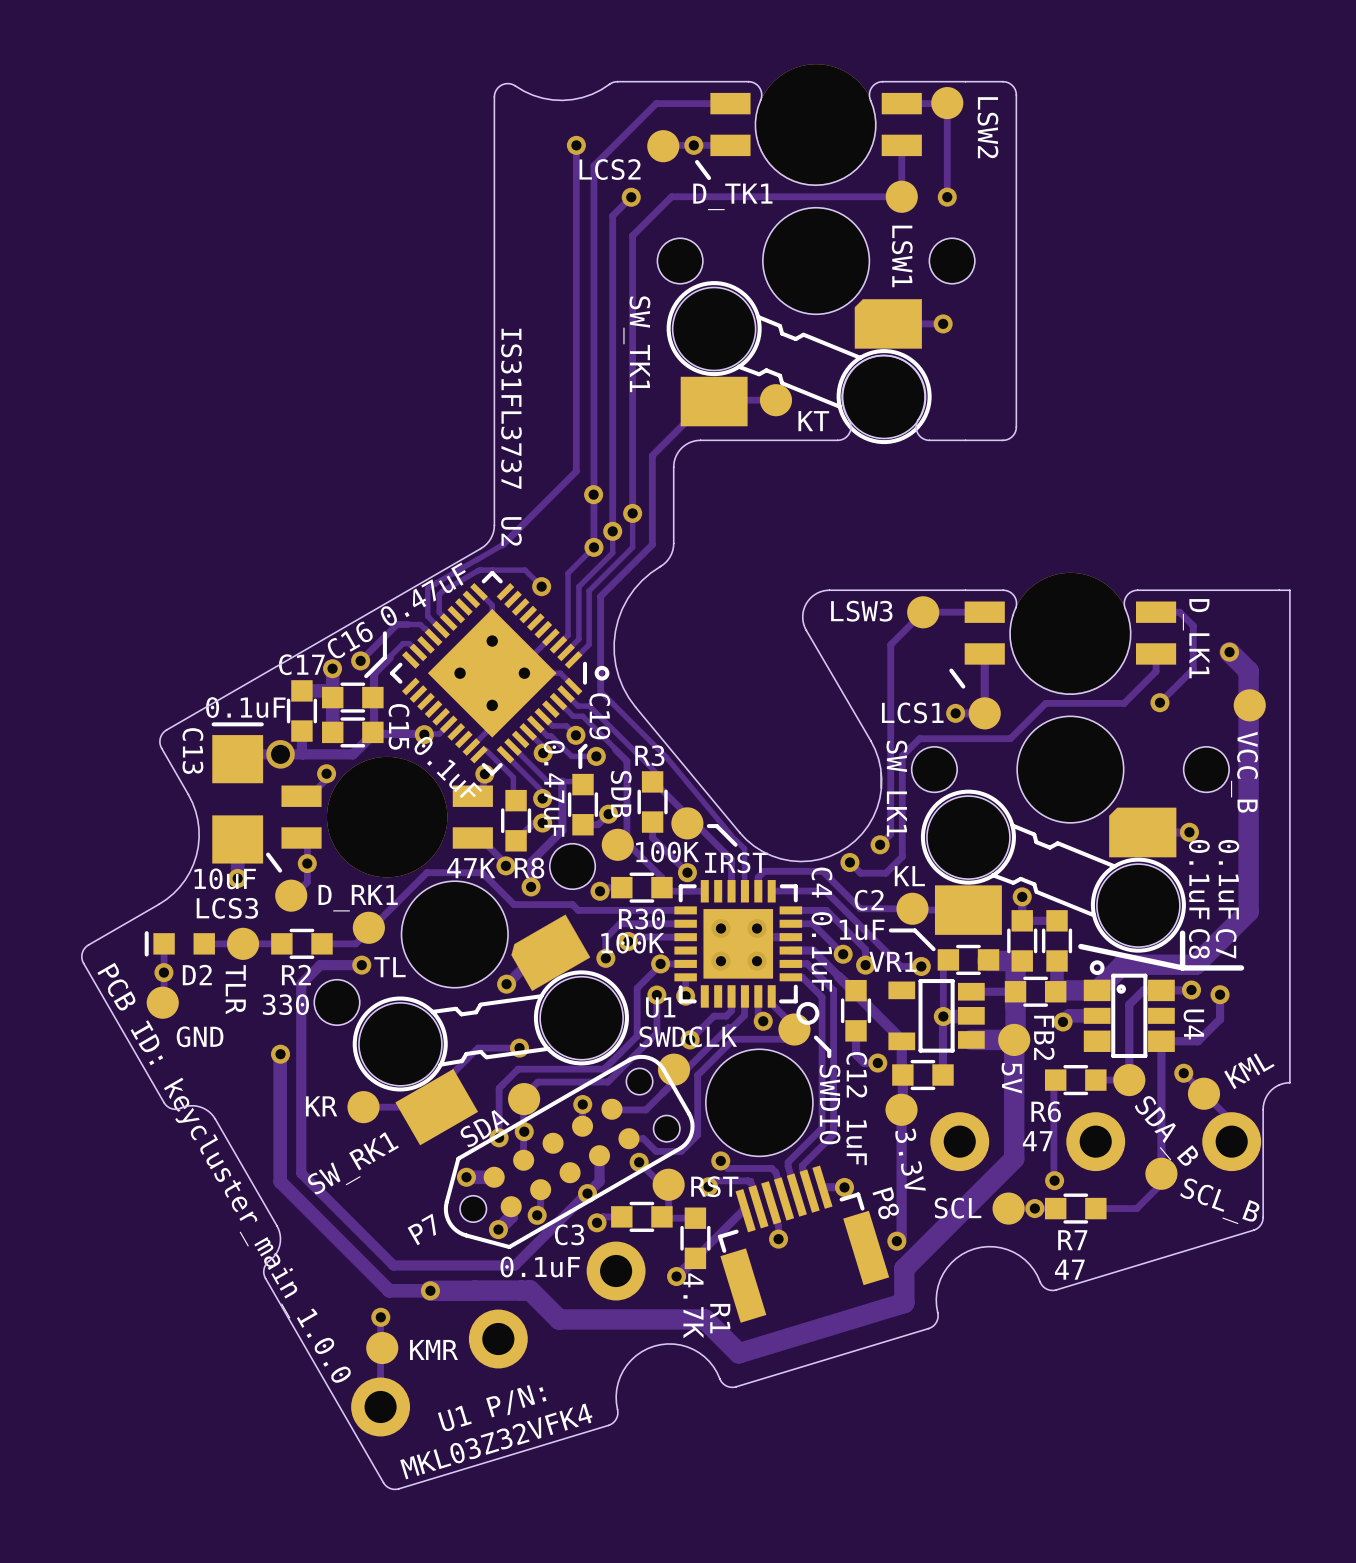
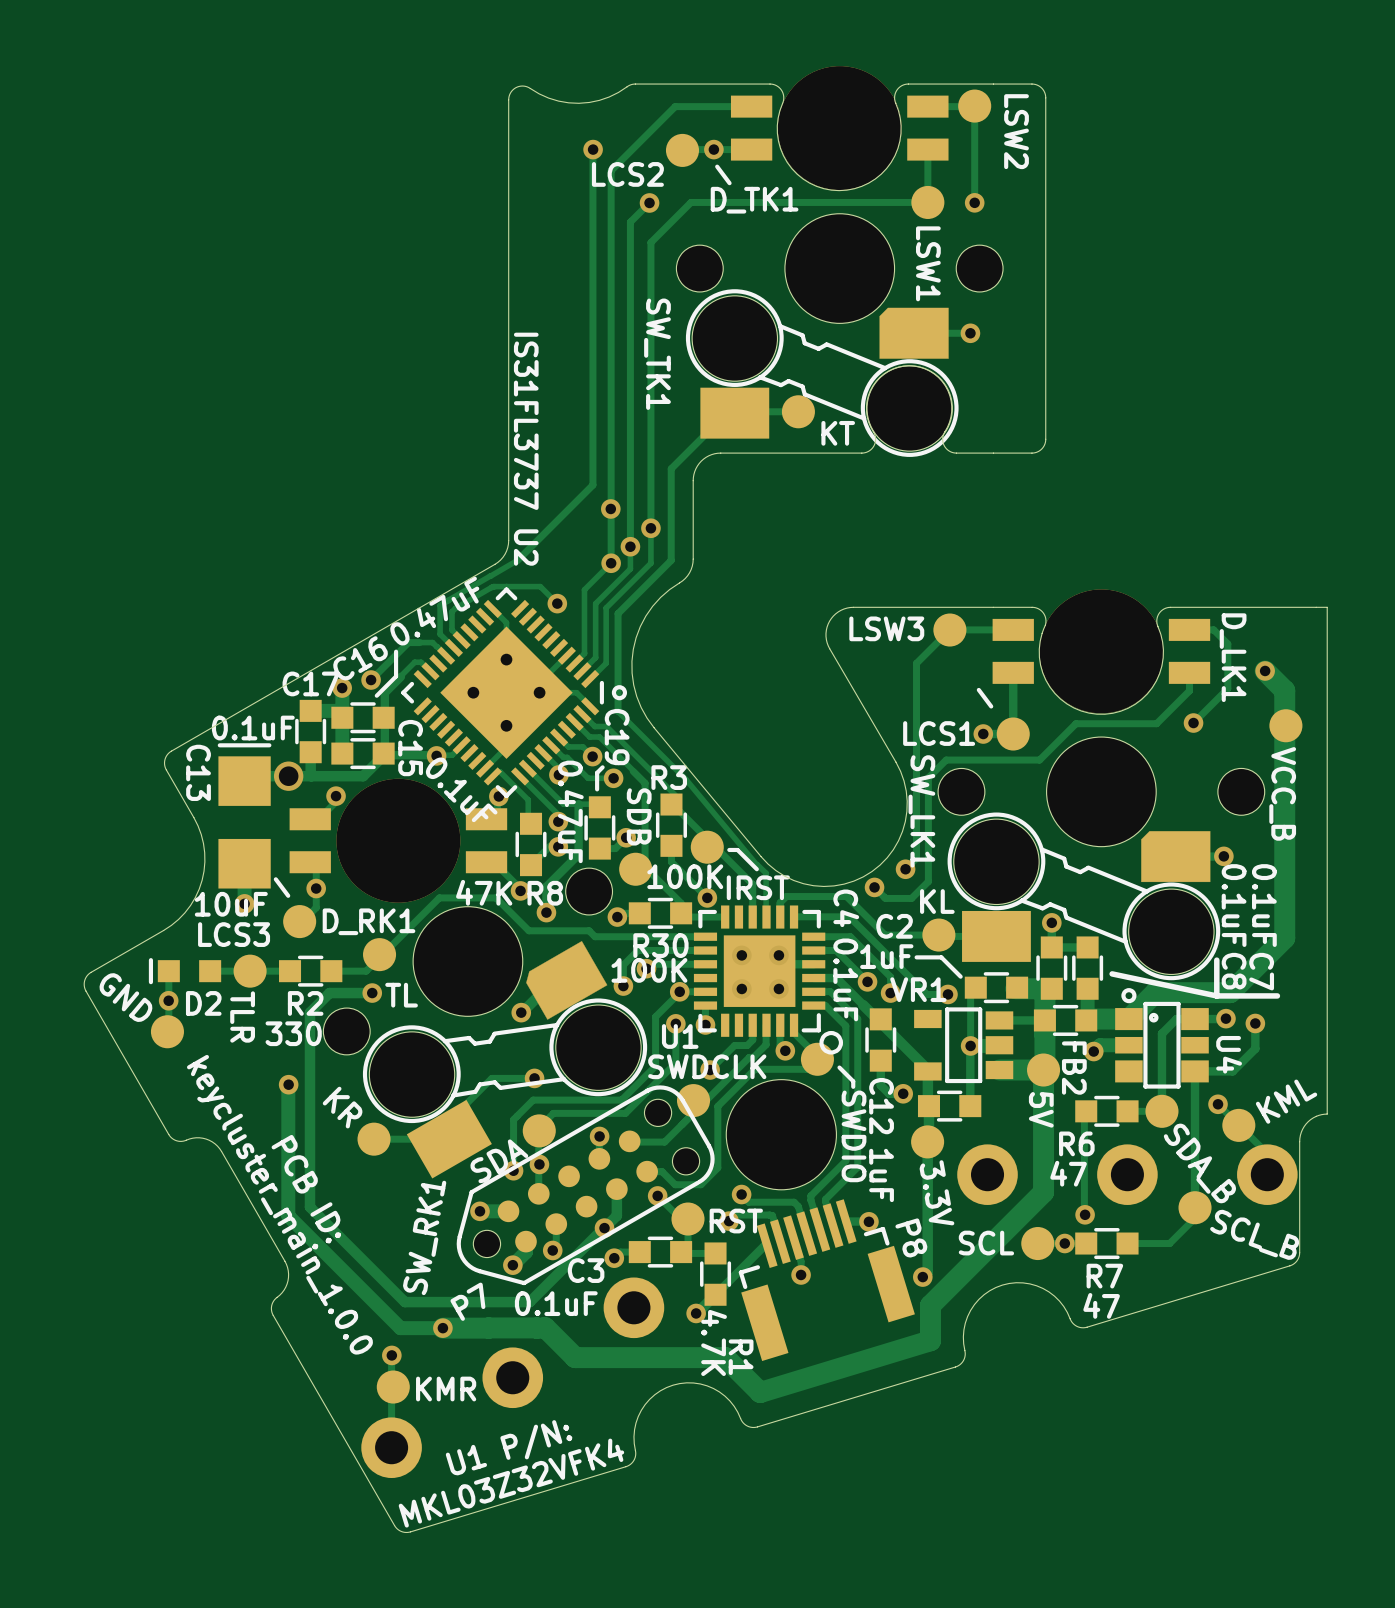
part value rotation: 0° (200, 1036) -> 40° clockwise (125, 997)
part value position: GND (200, 1036) -> GND (125, 997)
part value rotation: 0° (321, 1106) -> 45° clockwise (342, 1107)
text: none -> PCB ID: (306, 1189)
SW_RK1 name rotation: 0° (353, 1163) -> 50° counterclockwise (424, 1237)
text: PCB ID: keycluster_main_1.0.0 (224, 1172) -> keycluster_main_1.0.0 (279, 1204)
P7 name position: P7 (421, 1229) -> P7 (467, 1301)

